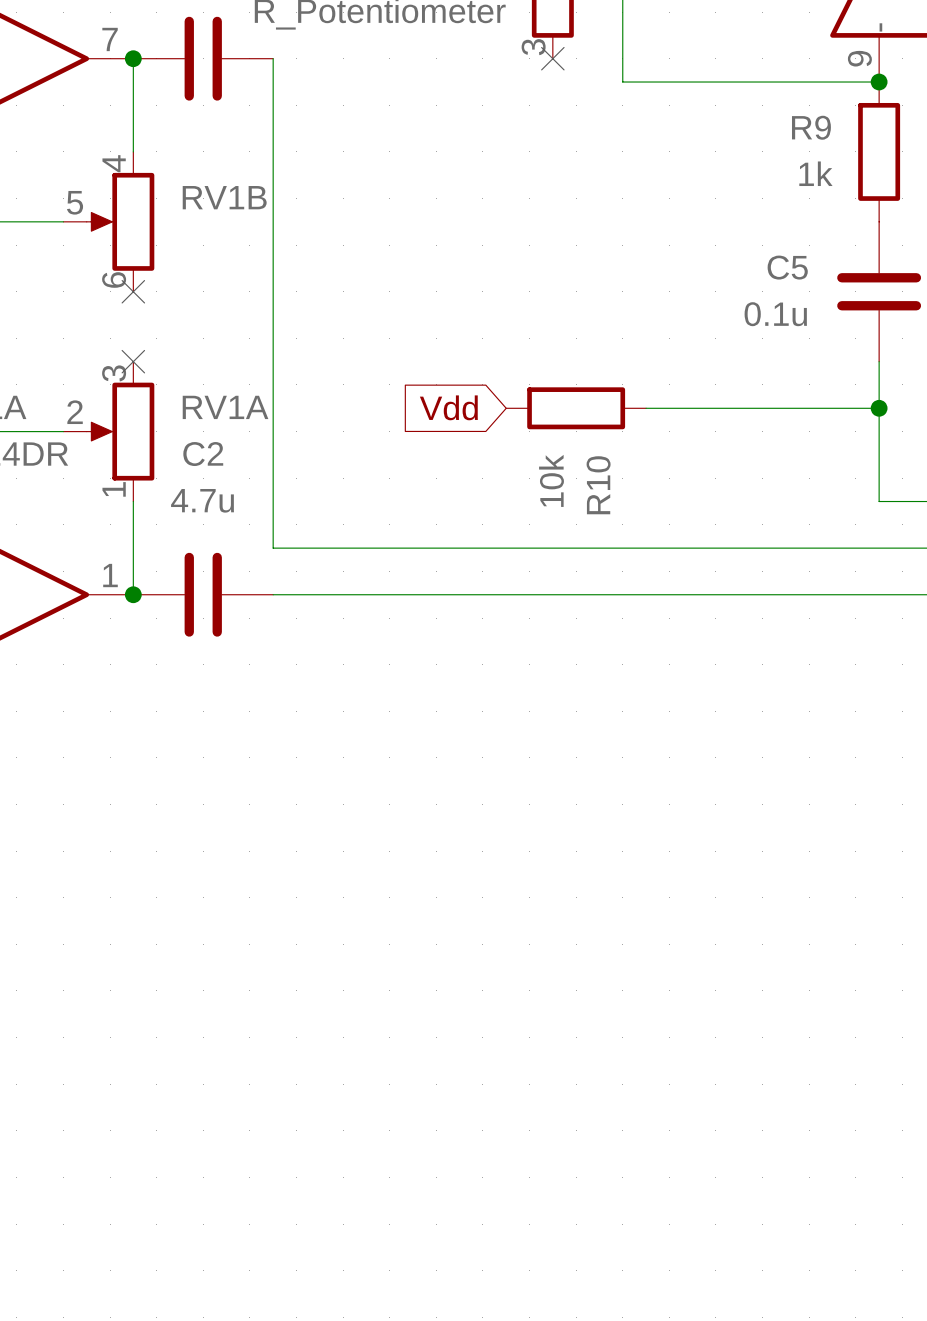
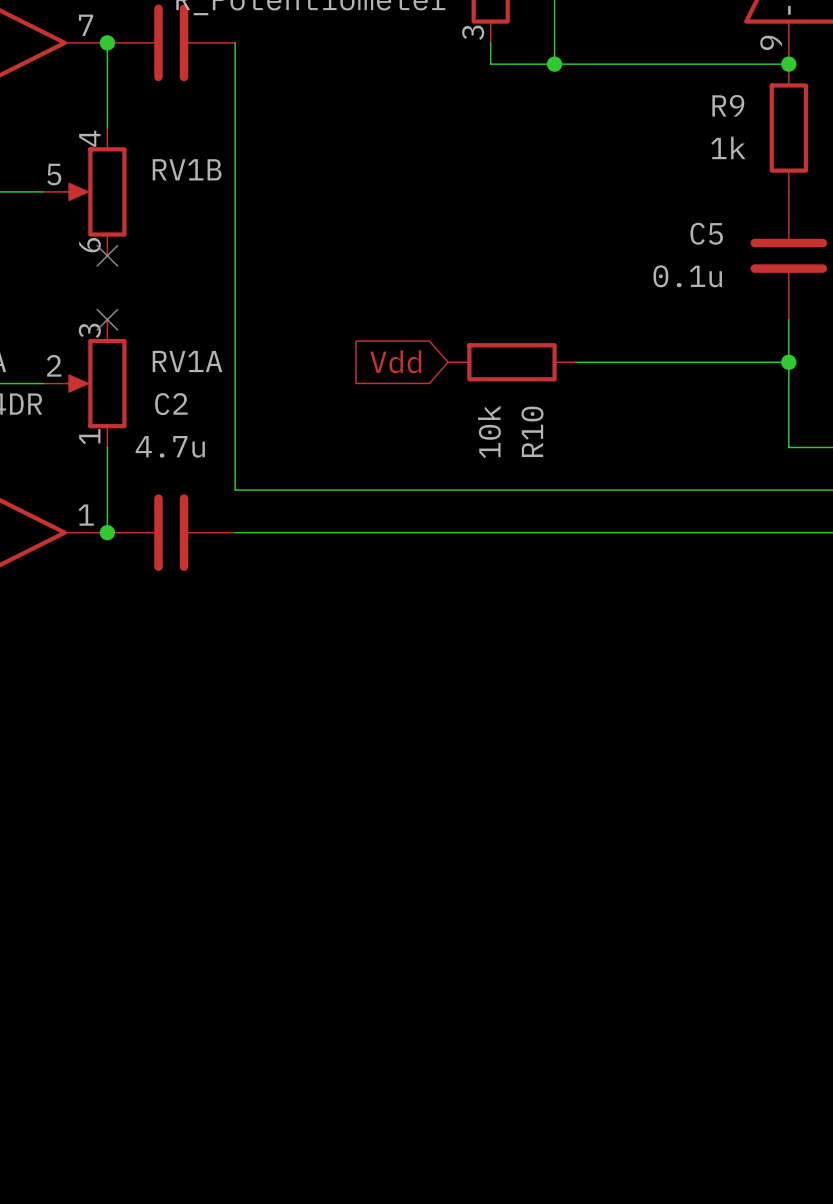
wire: none -> (490, 42) (490, 64) (554, 64)
no-connect mark: (552, 58) -> none
junction: none -> (554, 64)

